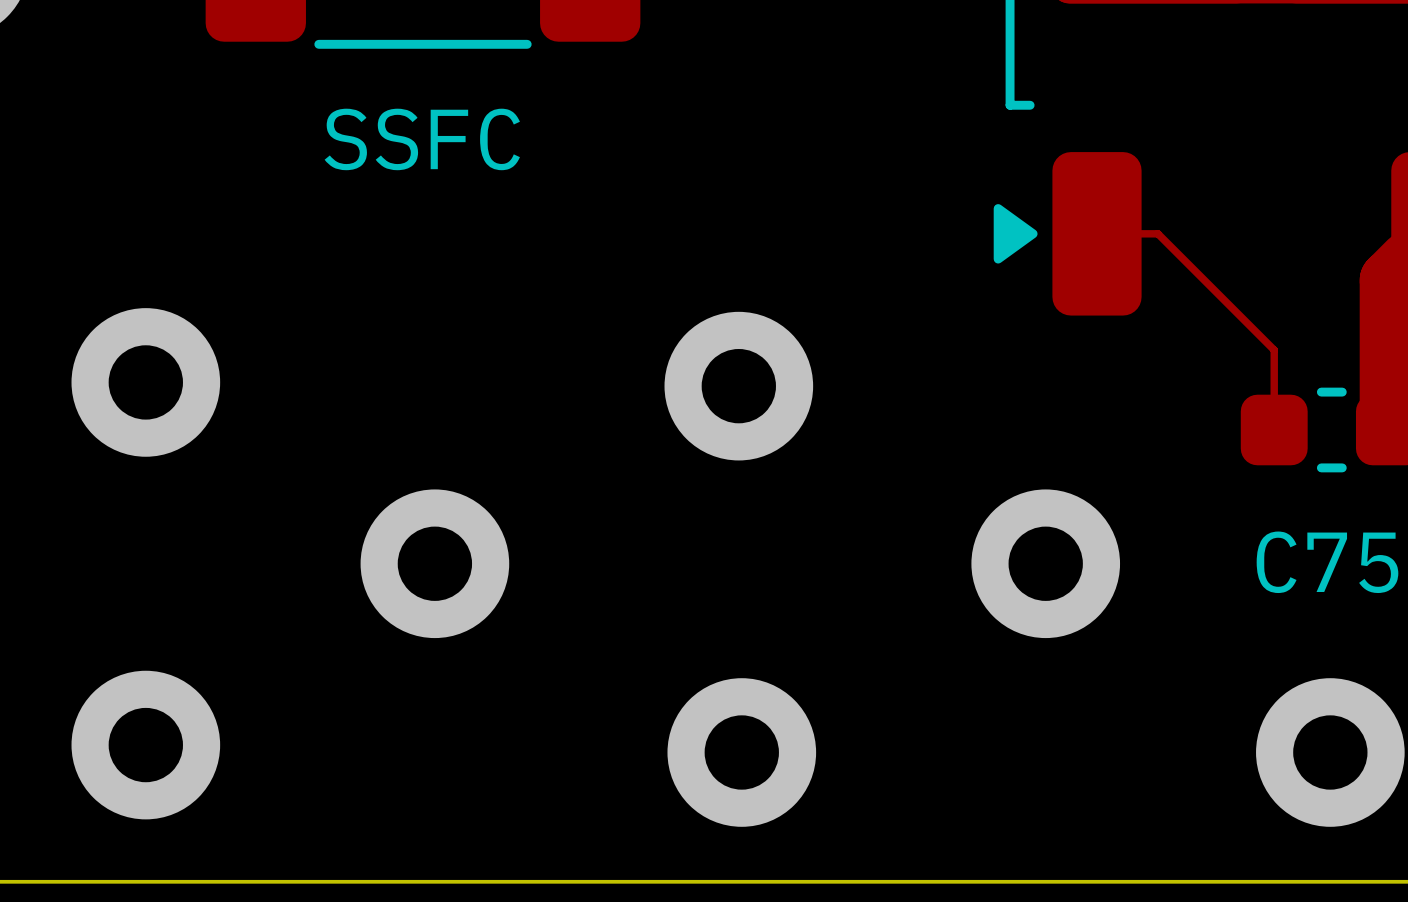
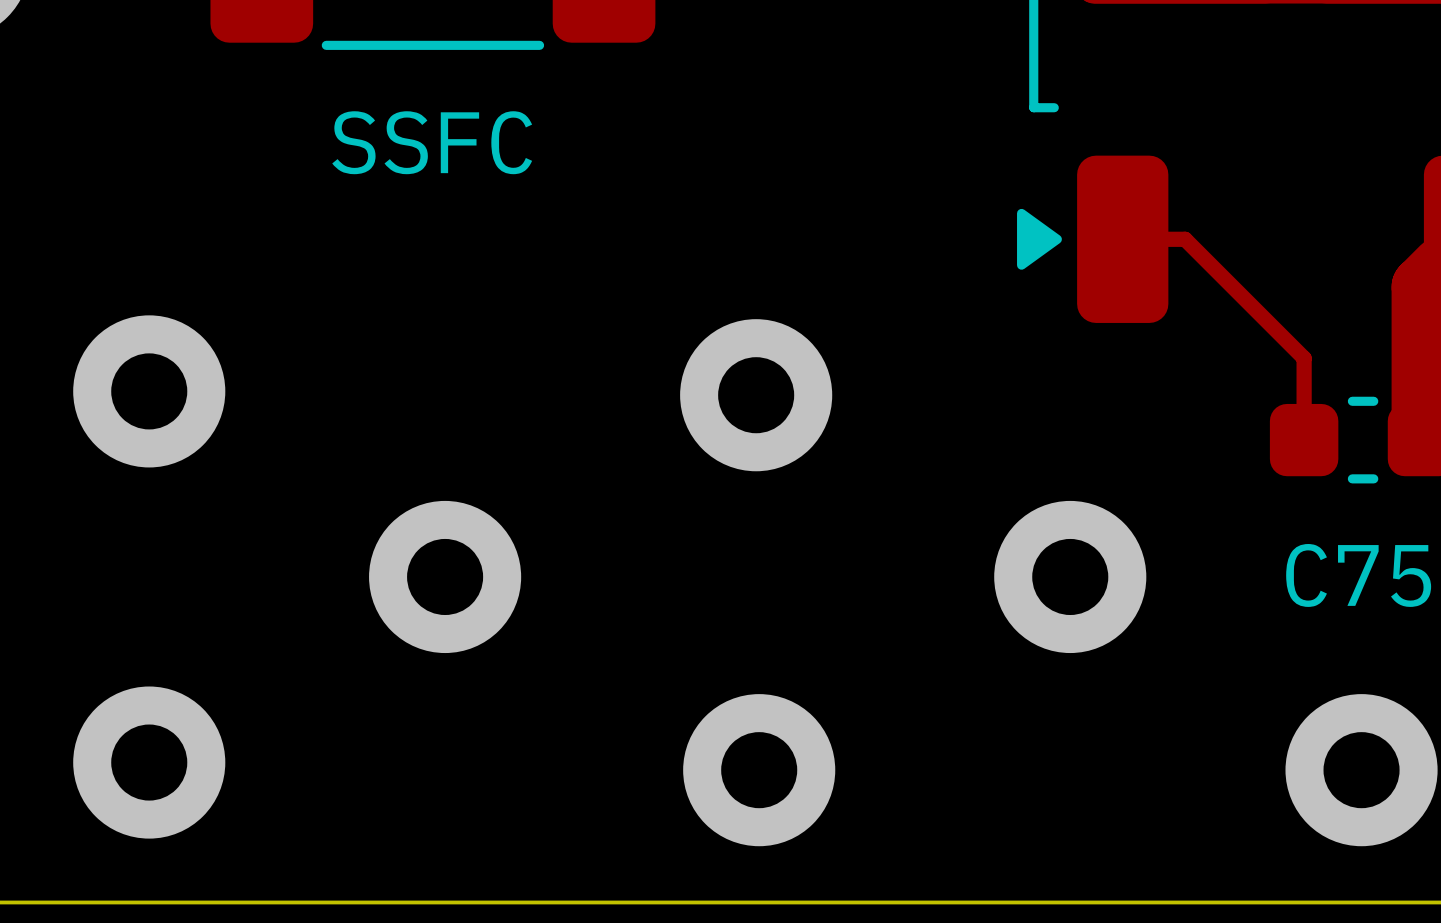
track width: thin (1097, 233) (1157, 233) (1274, 350) (1274, 429) -> thick (1122, 239) (1185, 239) (1304, 358) (1304, 440)

